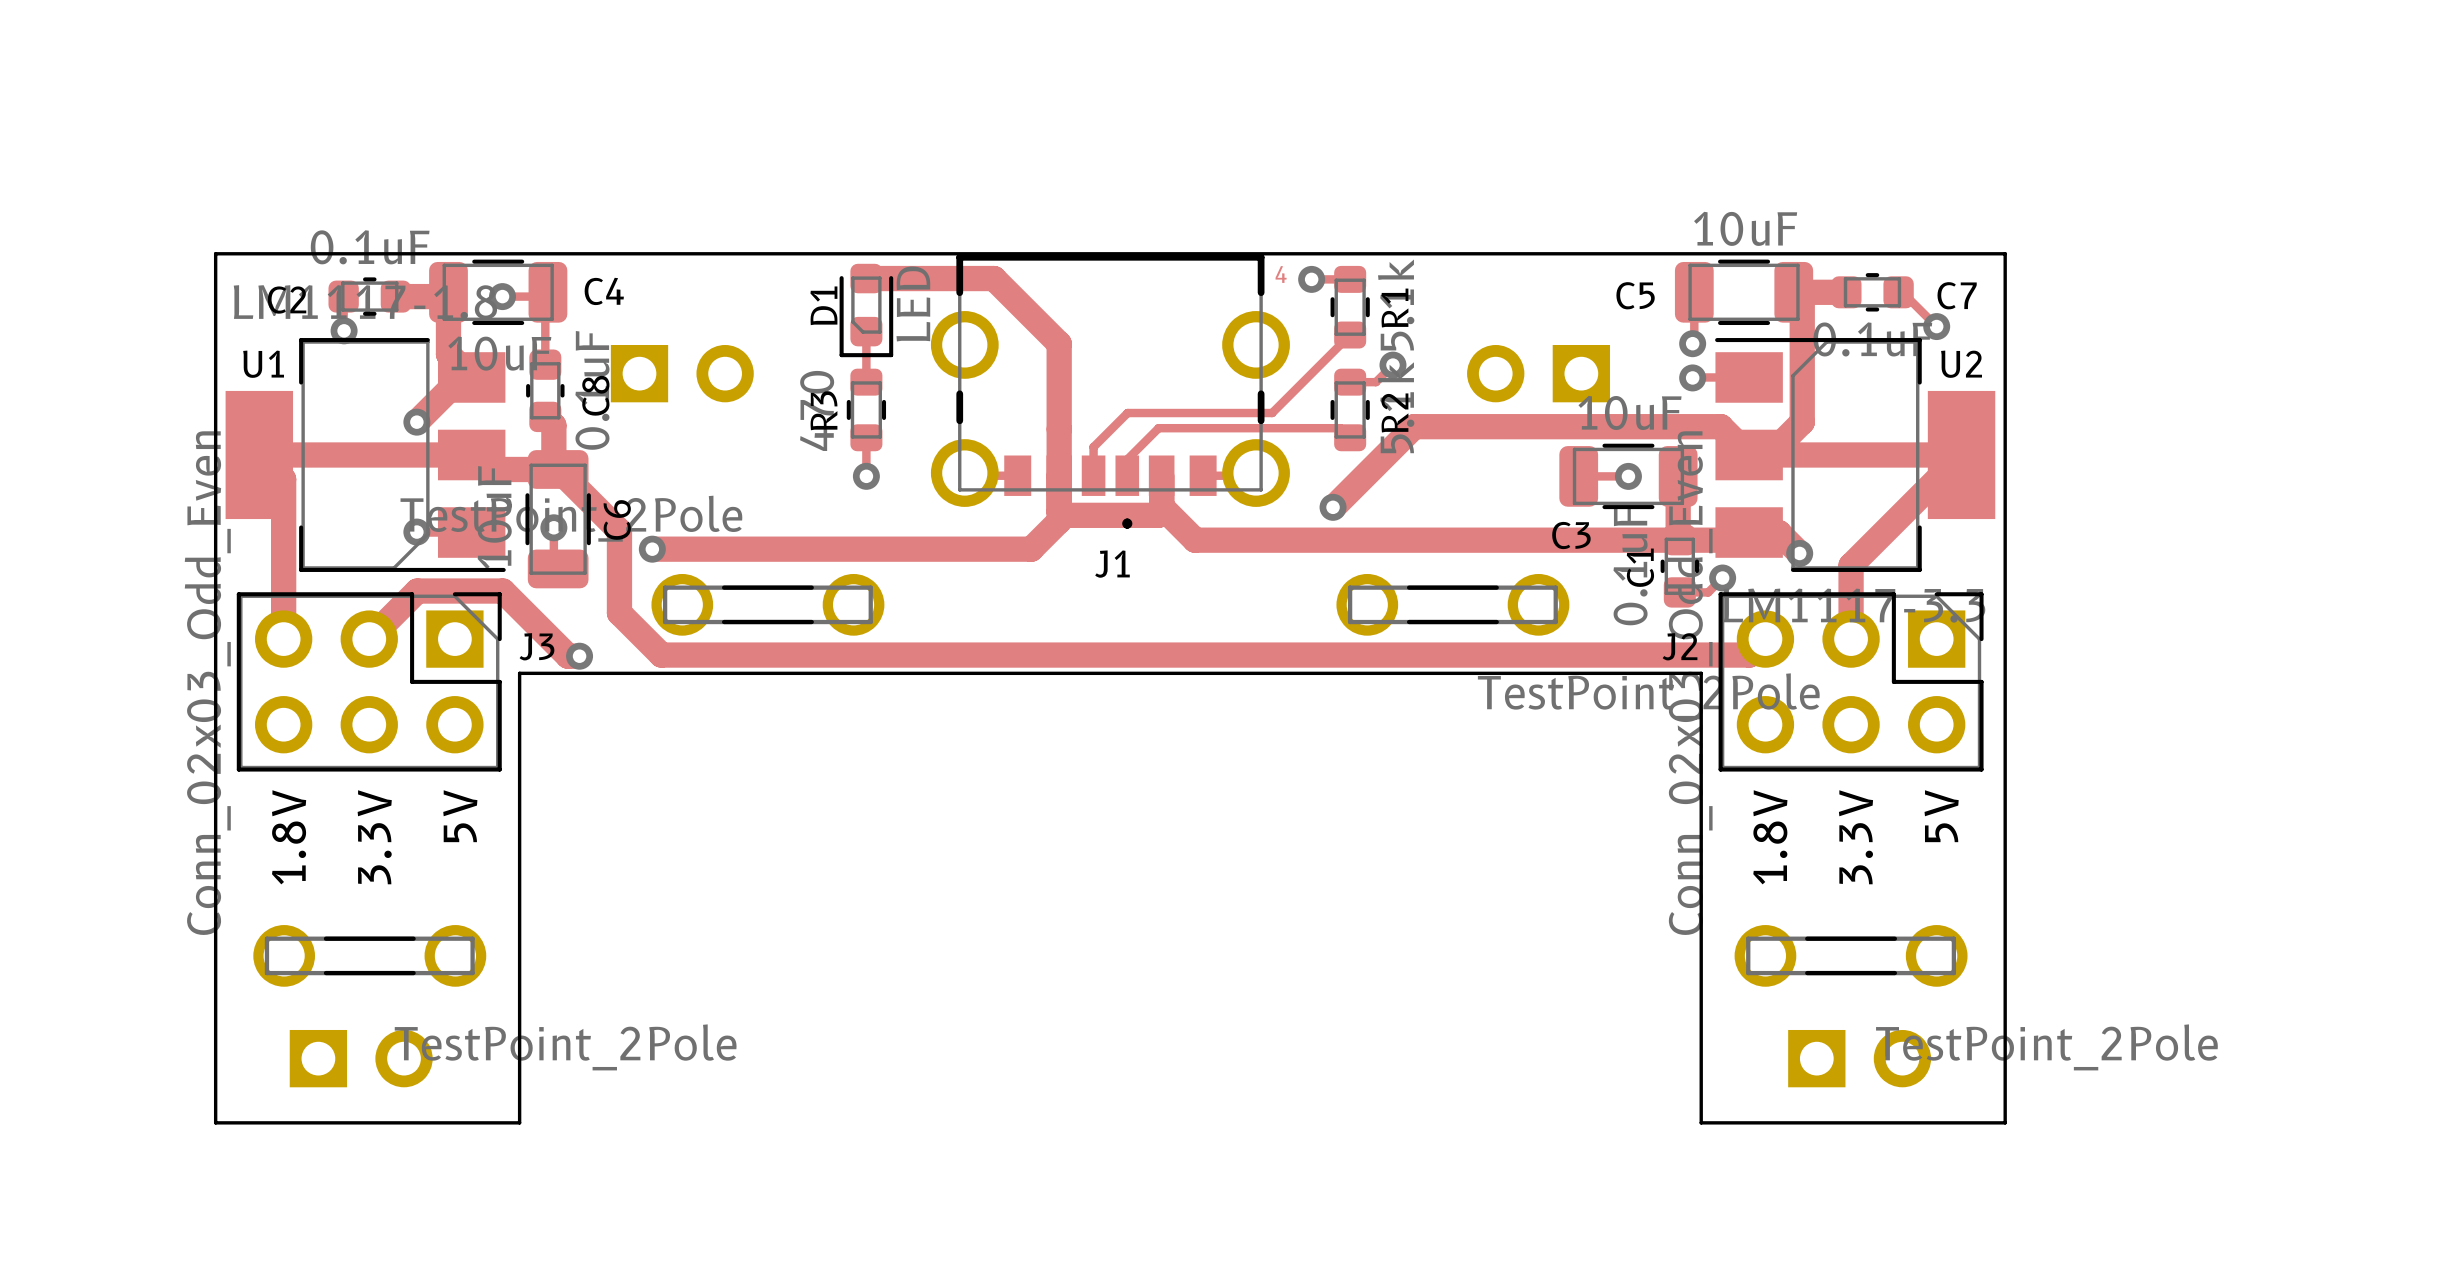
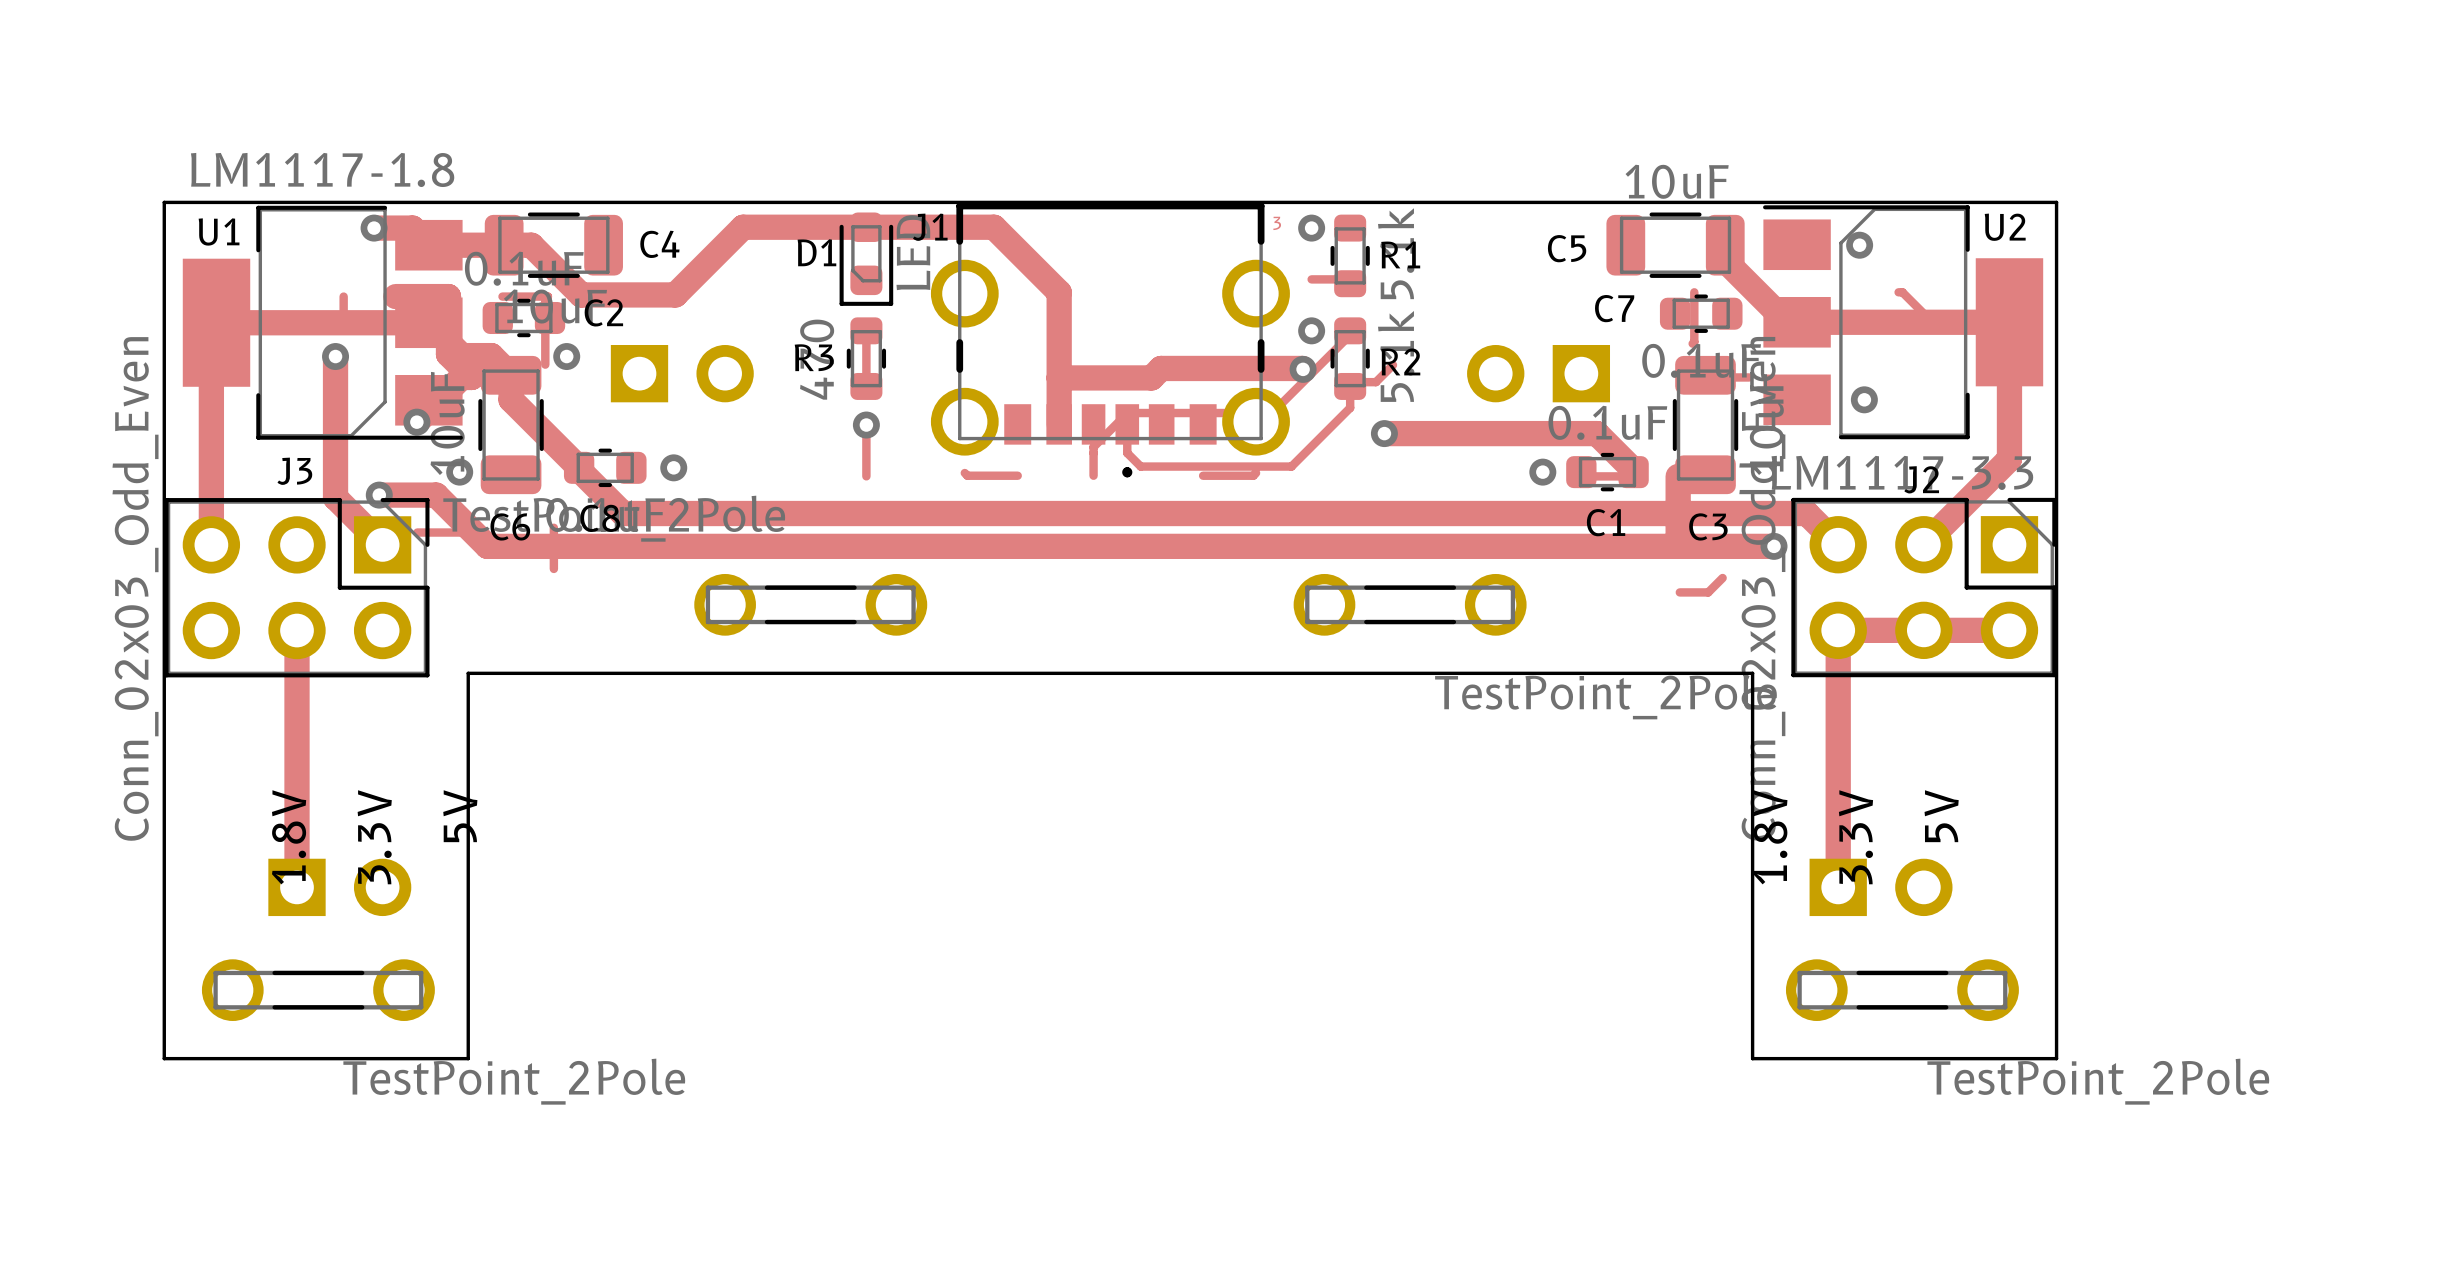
text: none -> 3 (1277, 223)
via: none -> (374, 228)
via: none -> (1311, 228)
track: none -> (1725, 245) (1725, 260) (1786, 322) (2009, 322) (2009, 459) (1923, 544)
via: none -> (1859, 245)
text: 4 (1281, 274) -> none
track: (866, 278) (993, 278) (1059, 343) -> (374, 228) (412, 228) (428, 245) (531, 245) (581, 294) (675, 294) (743, 227) (993, 227) (1059, 292) (1059, 343)
via: (1311, 279) -> none
C4 position: (498, 292) -> (553, 245)
C5 position: (1744, 292) -> (1675, 245)
track: (1846, 292) (1793, 292) (1802, 300) (1802, 422) (1769, 454) -> none
C7 position: (1872, 292) -> (1701, 313)
C7 name position: C7 (1957, 295) -> C7 (1614, 308)
C2 position: (369, 296) -> (523, 317)
via: (502, 296) -> none
C2 name position: C2 (287, 300) -> C2 (603, 312)
D1 name rotation: 0° (823, 305) -> 90° clockwise (816, 252)
R1 position: (1350, 307) -> (1350, 255)
R1 name rotation: 0° (1394, 308) -> 90° clockwise (1400, 254)
D1 position: (866, 310) -> (866, 259)
via: (1936, 326) -> none
via position: (344, 330) -> (335, 356)
via: none -> (1311, 330)
via: (1692, 343) -> none
track: none -> (335, 356) (335, 497) (382, 544)
via: none -> (566, 356)
U1 name position: U1 (263, 364) -> U1 (219, 231)
U2 name position: U2 (1961, 364) -> U2 (2005, 227)
via: (1392, 365) -> none
track: none -> (1303, 369) (1161, 368) (1151, 377) (1059, 377)
via: none -> (1303, 369)
via: (1692, 377) -> none
track: none -> (1350, 386) (1350, 407) (1291, 466) (1140, 466) (1127, 453) (1127, 424)
C8 rotation: 0° (545, 390) -> 90° clockwise (605, 467)
C8 position: (545, 390) -> (605, 467)
J1 position: (1110, 391) -> (1110, 339)
via: none -> (1864, 399)
R3 position: (866, 409) -> (866, 358)
R2 position: (1350, 409) -> (1350, 358)
R3 name rotation: 0° (824, 410) -> 90° clockwise (814, 357)
R2 name rotation: 0° (1394, 412) -> 90° clockwise (1400, 361)
track: (545, 416) (553, 425) (553, 469) (486, 469) (471, 454) (259, 454) (283, 479) (283, 639) -> none
track: (1059, 424) (1059, 521) (1031, 549) (652, 549) -> none
track: none -> (1384, 433) (1596, 433) (1633, 470)
via: none -> (1384, 433)
track: (1350, 437) (1340, 428) (1158, 428) (1127, 459) (1127, 475) -> none
U1 position: (365, 454) -> (322, 322)
U2 position: (1855, 454) -> (1903, 322)
via: none -> (673, 467)
track: (558, 469) (619, 530) (619, 613) (661, 655) (1749, 655) (1765, 639) -> none
via: none -> (459, 472)
via: none -> (1542, 472)
track: (1161, 475) (1161, 512) (1158, 515) (1062, 515) (1059, 512) -> none
via position: (866, 476) -> (866, 425)
C3 rotation: 0° (1628, 476) -> 90° clockwise (1705, 425)
C3 position: (1628, 476) -> (1705, 425)
via: (1628, 476) -> none
track: none -> (379, 495) (436, 495) (487, 546) (1774, 546)
via: none -> (379, 495)
track: (1161, 506) (1195, 540) (1741, 540) (1749, 532) (1778, 532) (1799, 553) -> none
track: (1333, 507) (1414, 426) (1720, 426) (1749, 454) (1961, 454) (1851, 565) (1851, 639) -> none
via: (1333, 507) -> none
C6 position: (558, 519) -> (511, 425)
C6 name rotation: 0° (617, 519) -> 90° clockwise (510, 526)
C6 name position: C6 (617, 519) -> C6 (510, 526)
via: (553, 527) -> none
via: (416, 532) -> none
C3 name position: C3 (1571, 535) -> C3 (1708, 526)
track: none -> (1838, 544) (1807, 513) (622, 513) (511, 399) (511, 375) (491, 355) (461, 355) (428, 322) (216, 322) (211, 327) (211, 544)
via: (652, 549) -> none
via position: (1799, 553) -> (1774, 546)
J1 name position: J1 (1112, 564) -> J1 (930, 227)
C1 rotation: 0° (1679, 566) -> 90° clockwise (1607, 472)
C1 position: (1679, 566) -> (1607, 472)
via: (1722, 578) -> none
part position: (767, 604) -> (810, 604)
part position: (1452, 604) -> (1410, 604)
track: none -> (297, 630) (297, 887)
track: none -> (2009, 630) (1838, 630) (1838, 887)
track: (369, 639) (417, 591) (502, 591) (568, 656) (579, 656) -> none
J3 name position: J3 (536, 646) -> J3 (294, 471)
J2 name position: J2 (1680, 646) -> J2 (1921, 479)
via: (579, 656) -> none
board edge: (519, 673) (519, 1122) (215, 1122) (215, 253) (2005, 253) (2005, 1122) (1701, 1122) (1701, 673) -> (519, 673) (468, 673) (468, 1058) (164, 1058) (164, 202) (2056, 202) (2056, 1058) (1752, 1058) (1752, 673) (1701, 673)
J3 position: (369, 681) -> (297, 587)
J2 position: (1851, 681) -> (1923, 587)
part position: (369, 955) -> (318, 990)
part position: (1851, 955) -> (1902, 990)
part position: (361, 1058) -> (339, 887)
part position: (1859, 1058) -> (1881, 887)

